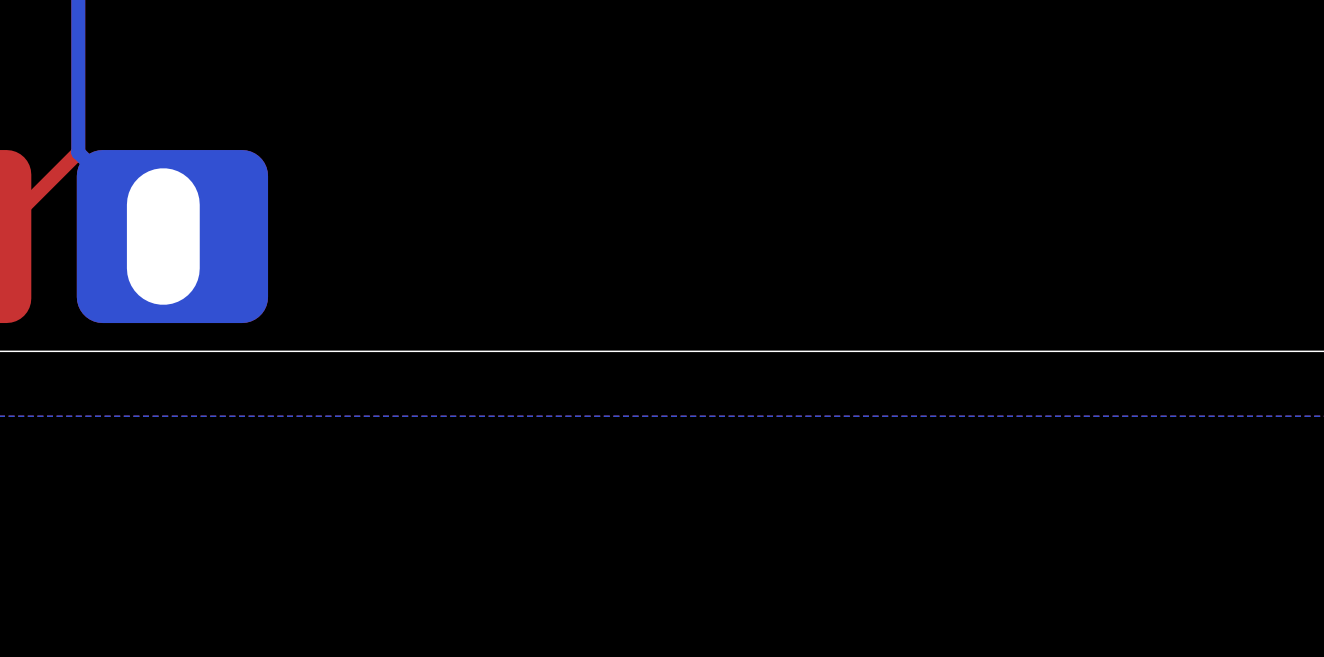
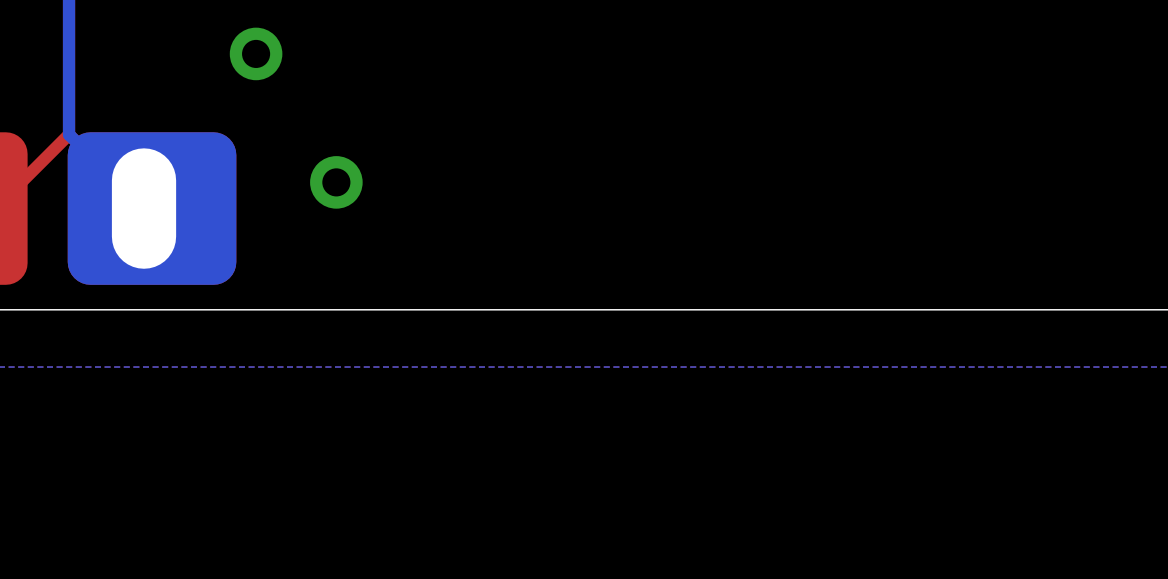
via: none -> (256, 53)
via: none -> (336, 182)

